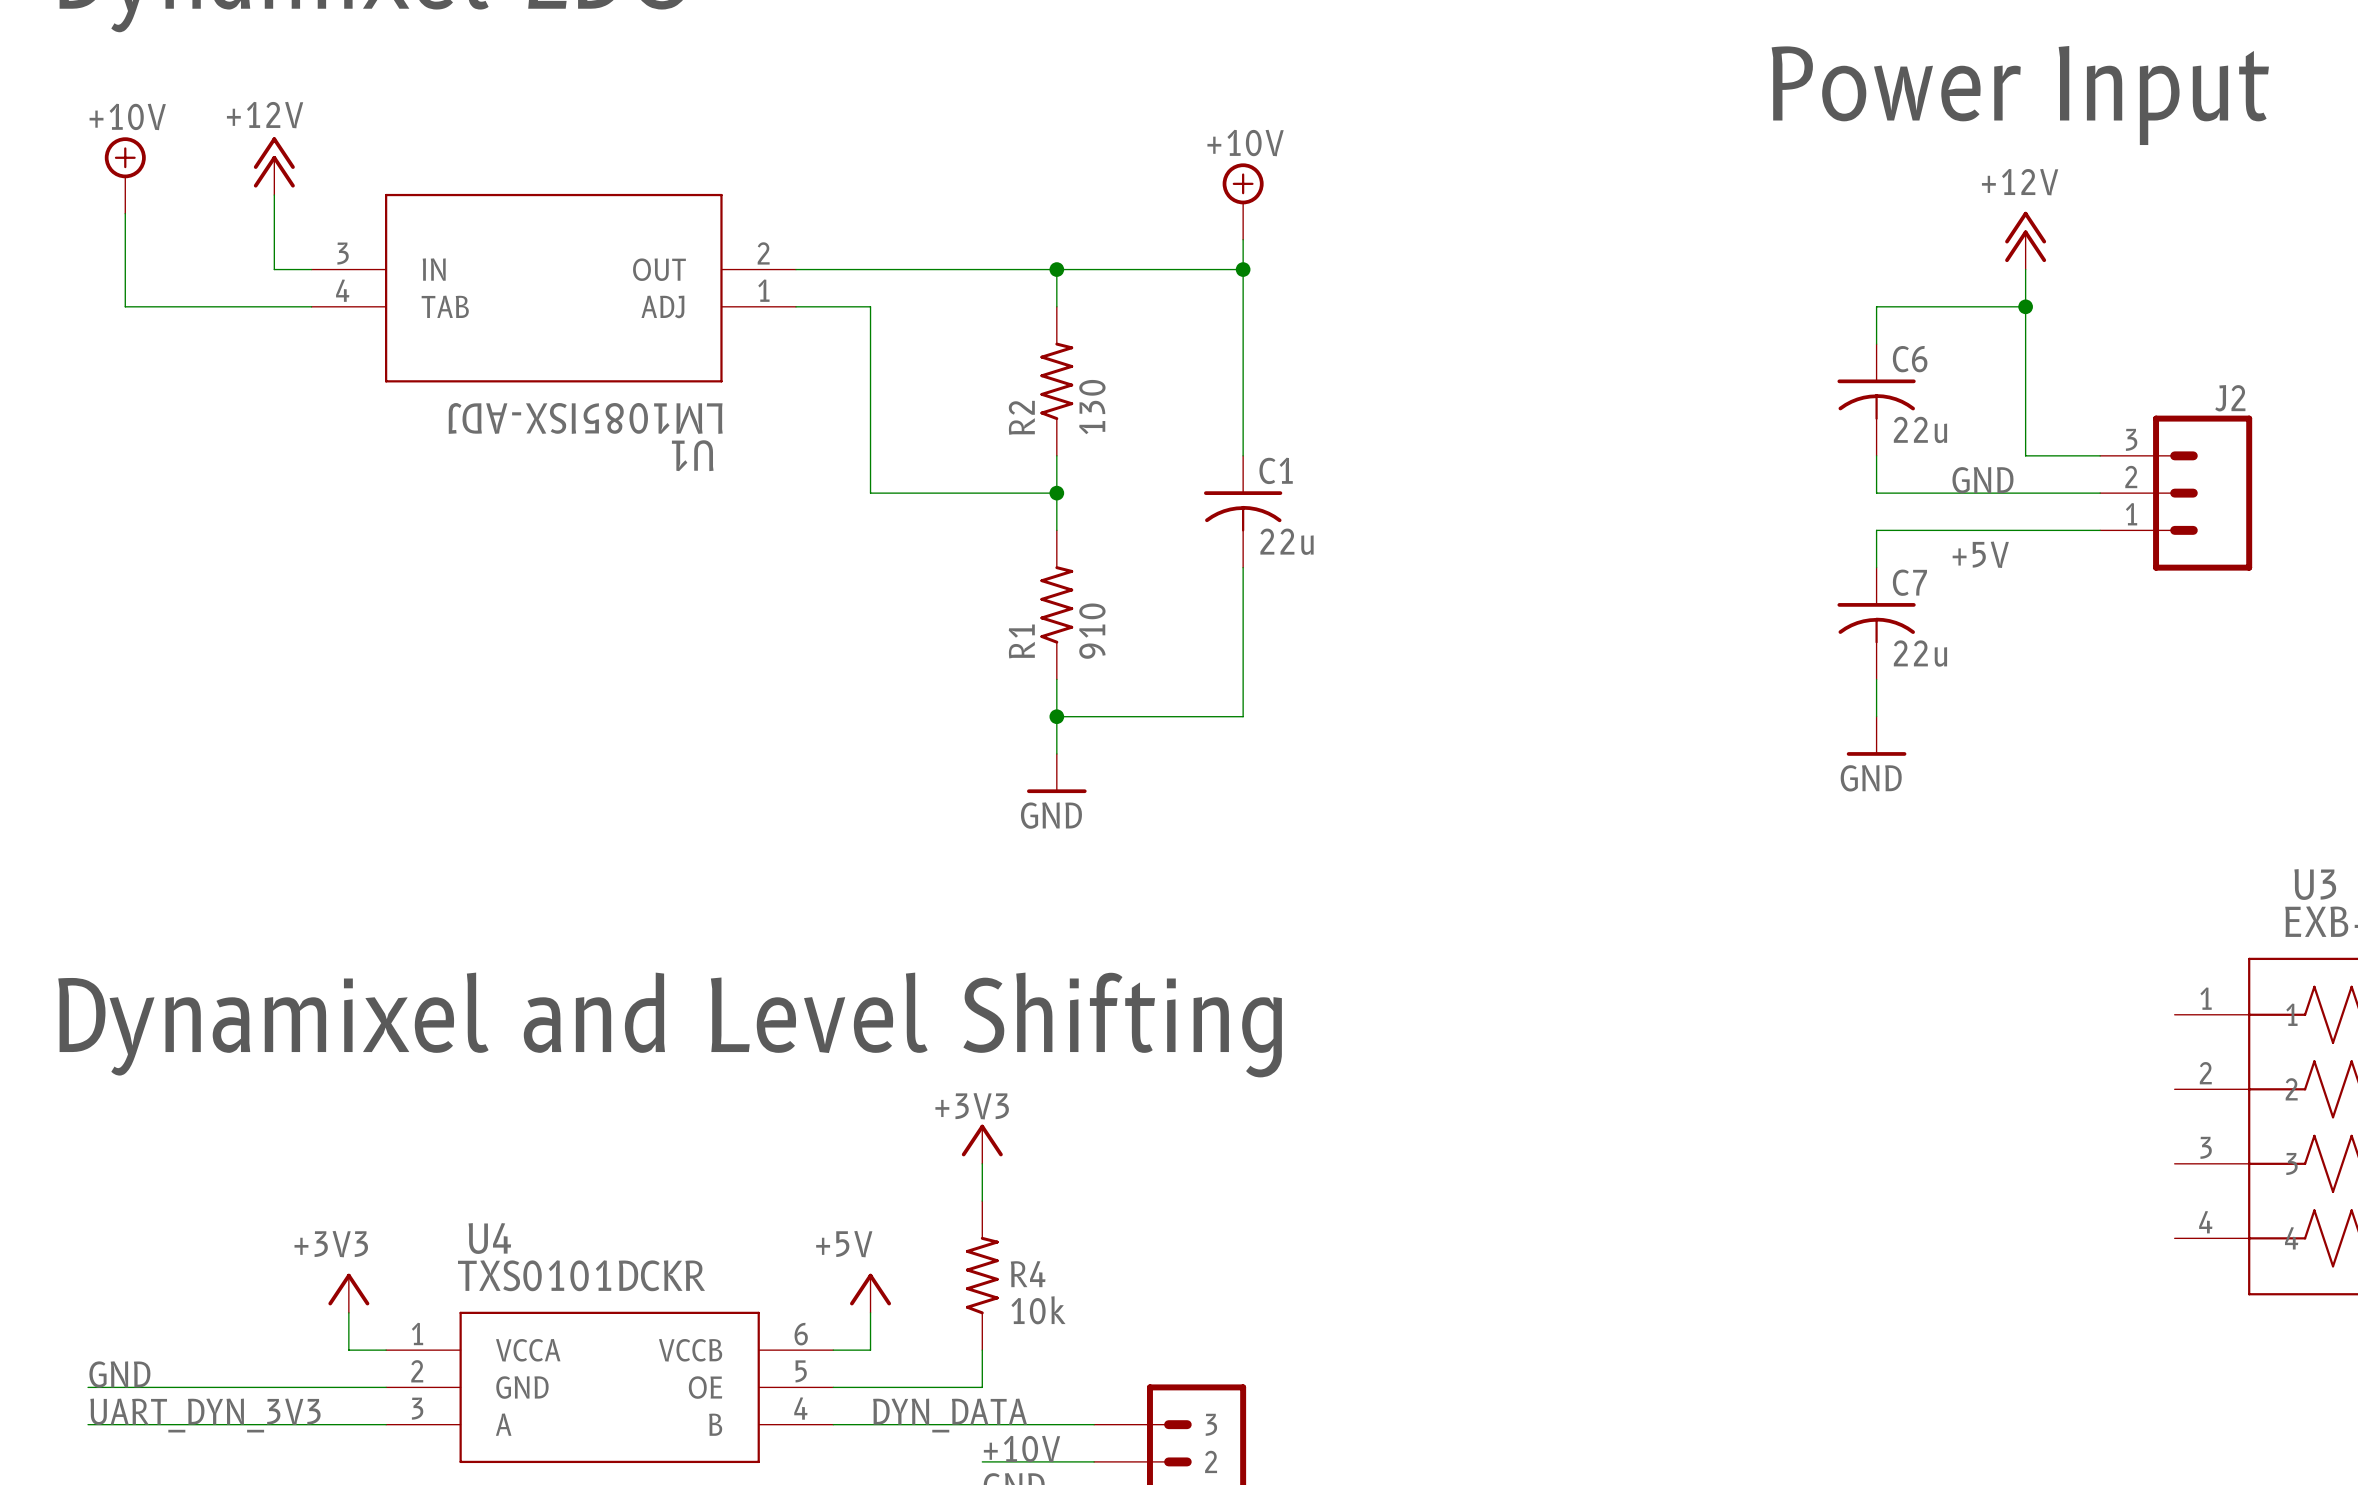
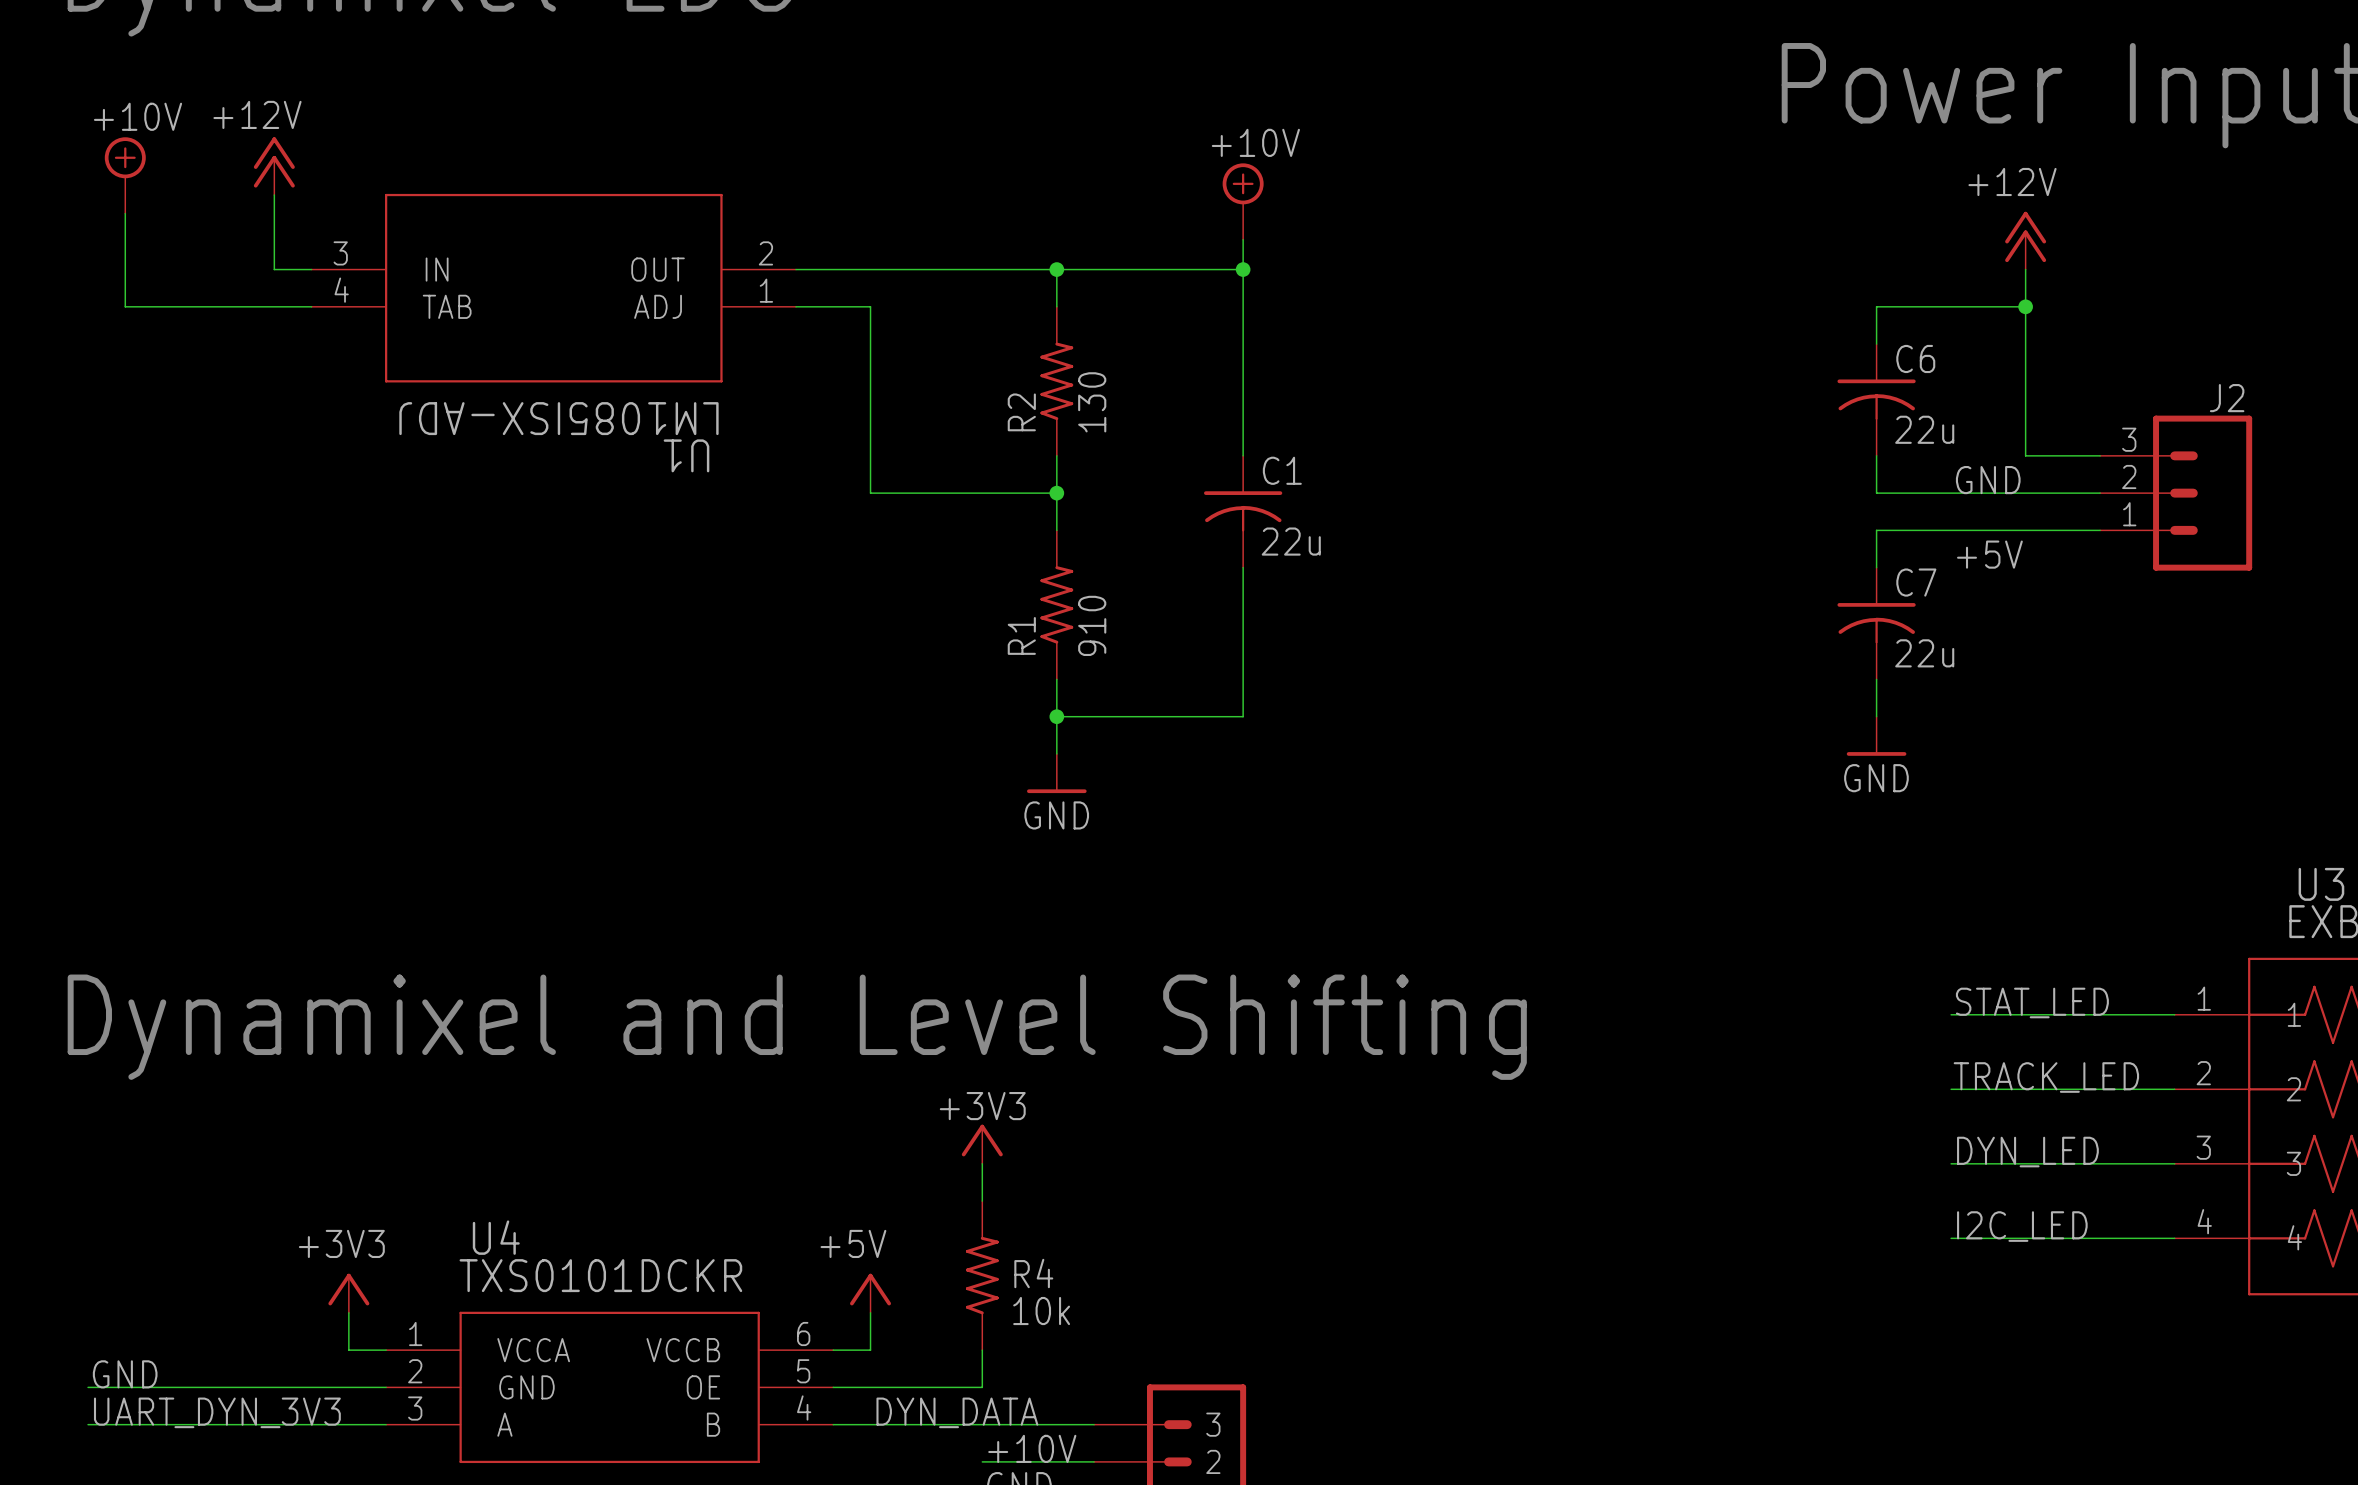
label: none -> STAT_LED (2032, 1002)
wire: none -> (1951, 1014) (2174, 1014)
label: none -> TRACK_LED (2046, 1077)
wire: none -> (1951, 1089) (2174, 1089)
label: none -> DYN_LED (2027, 1152)
wire: none -> (1951, 1163) (2174, 1163)
label: none -> I2C_LED (2022, 1226)
wire: none -> (1951, 1238) (2174, 1238)

